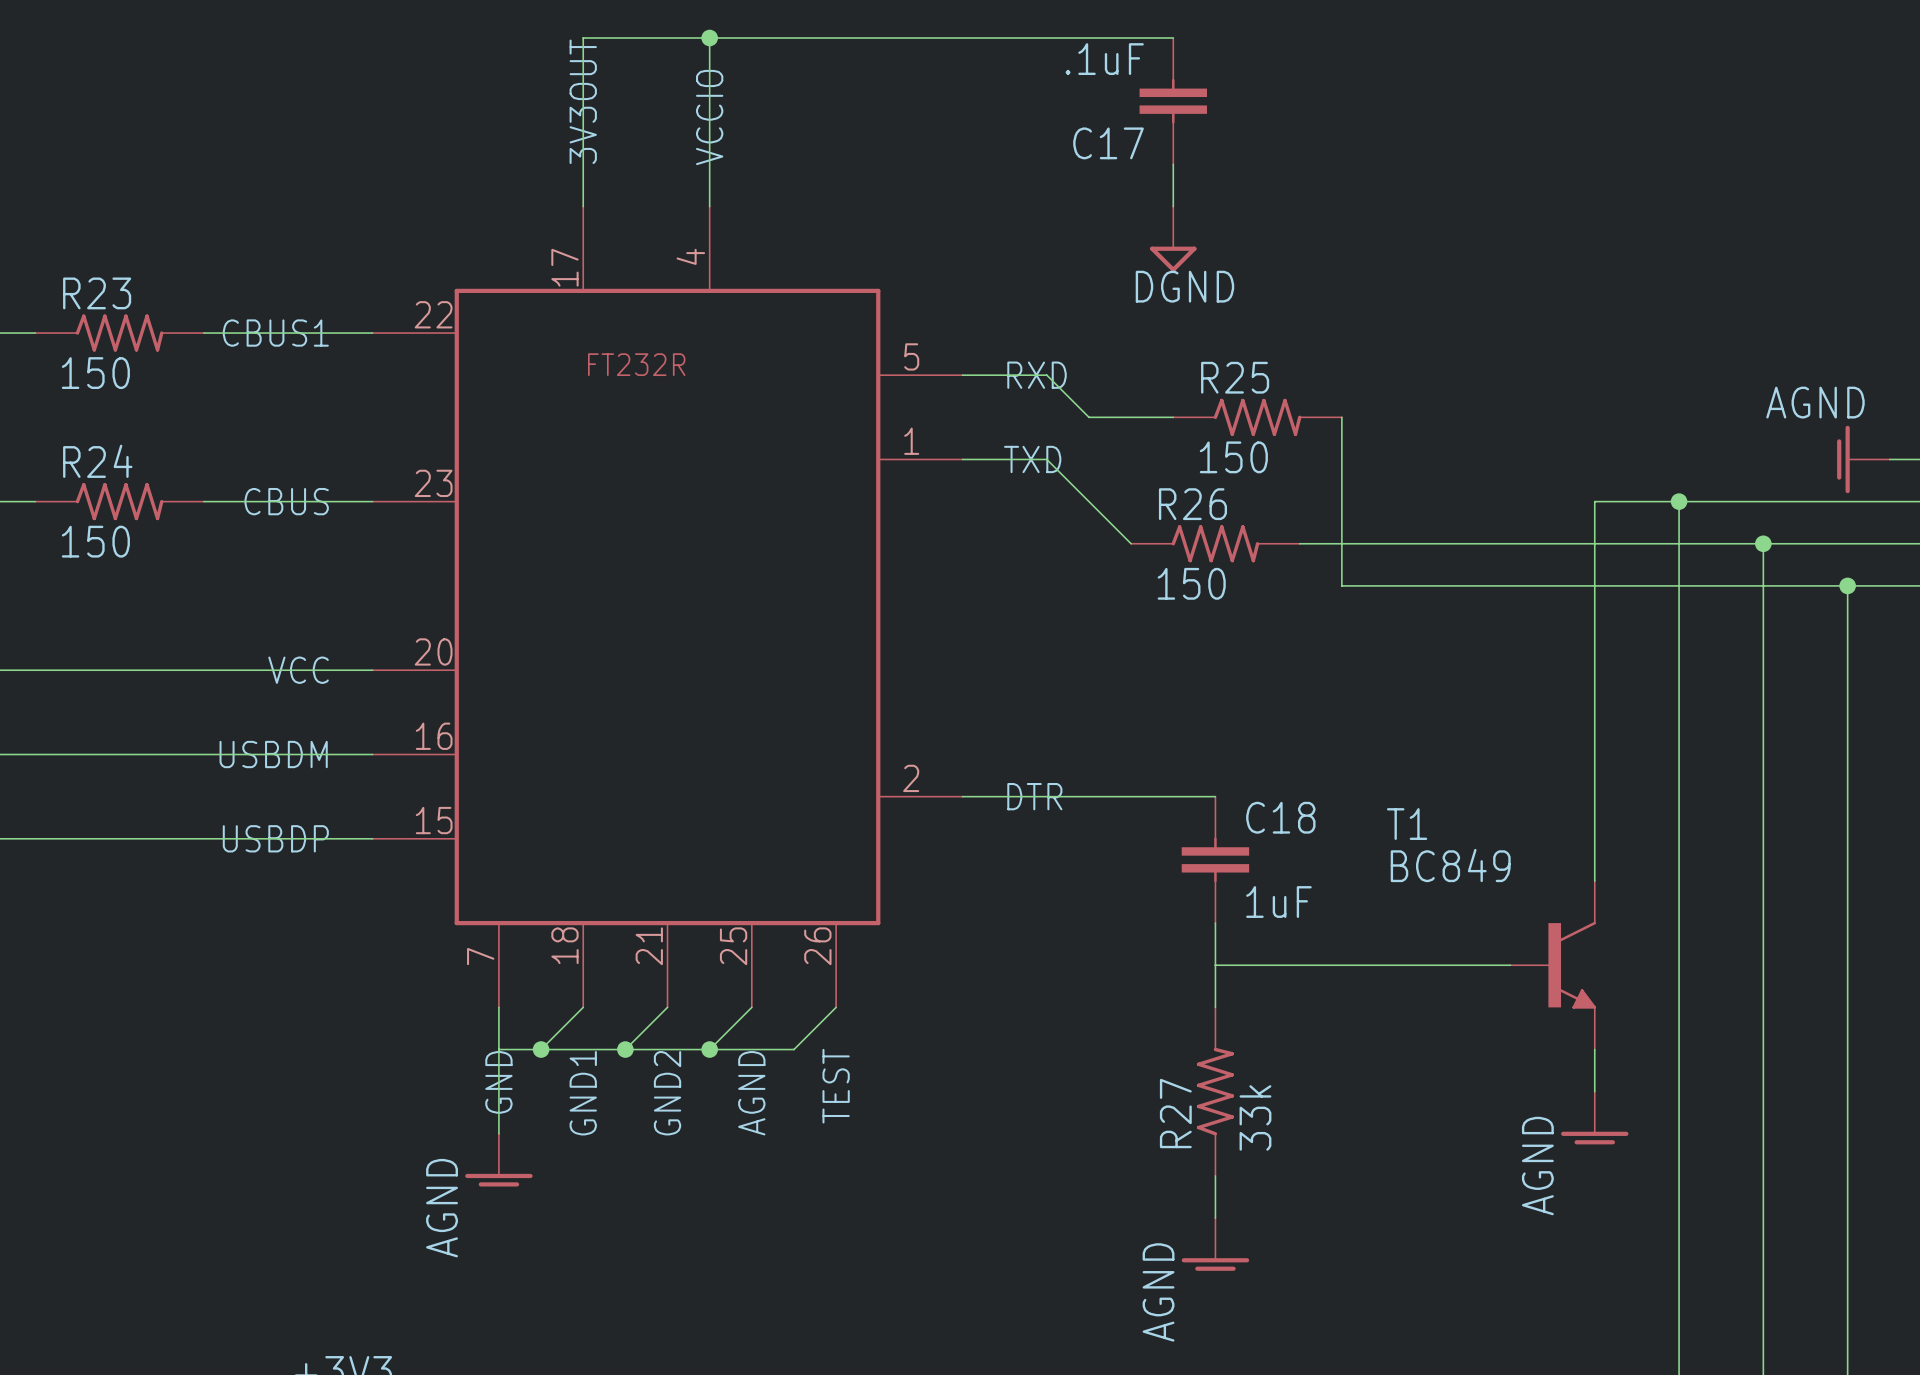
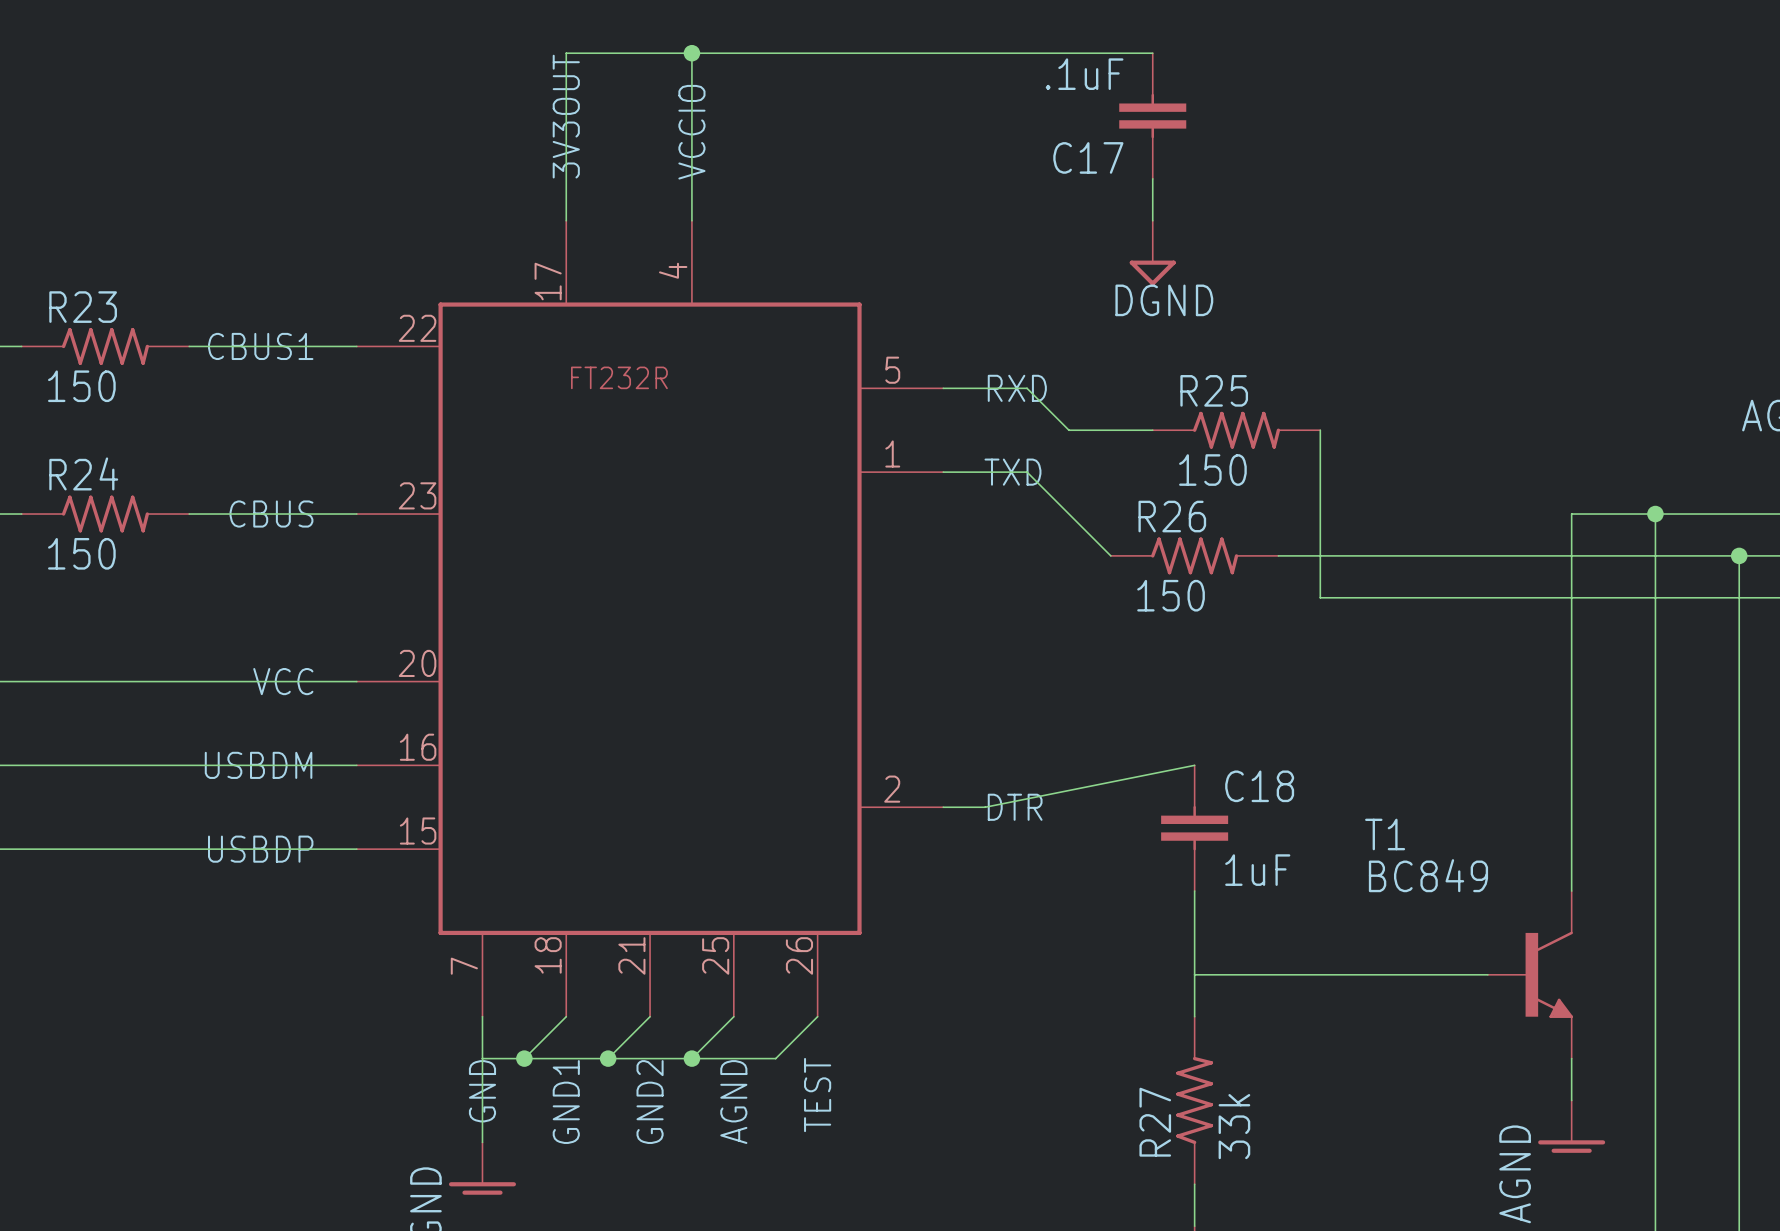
wire: (1004, 796) (1215, 796) -> (985, 807) (1194, 765)
C18 position: (1215, 859) -> (1194, 828)

